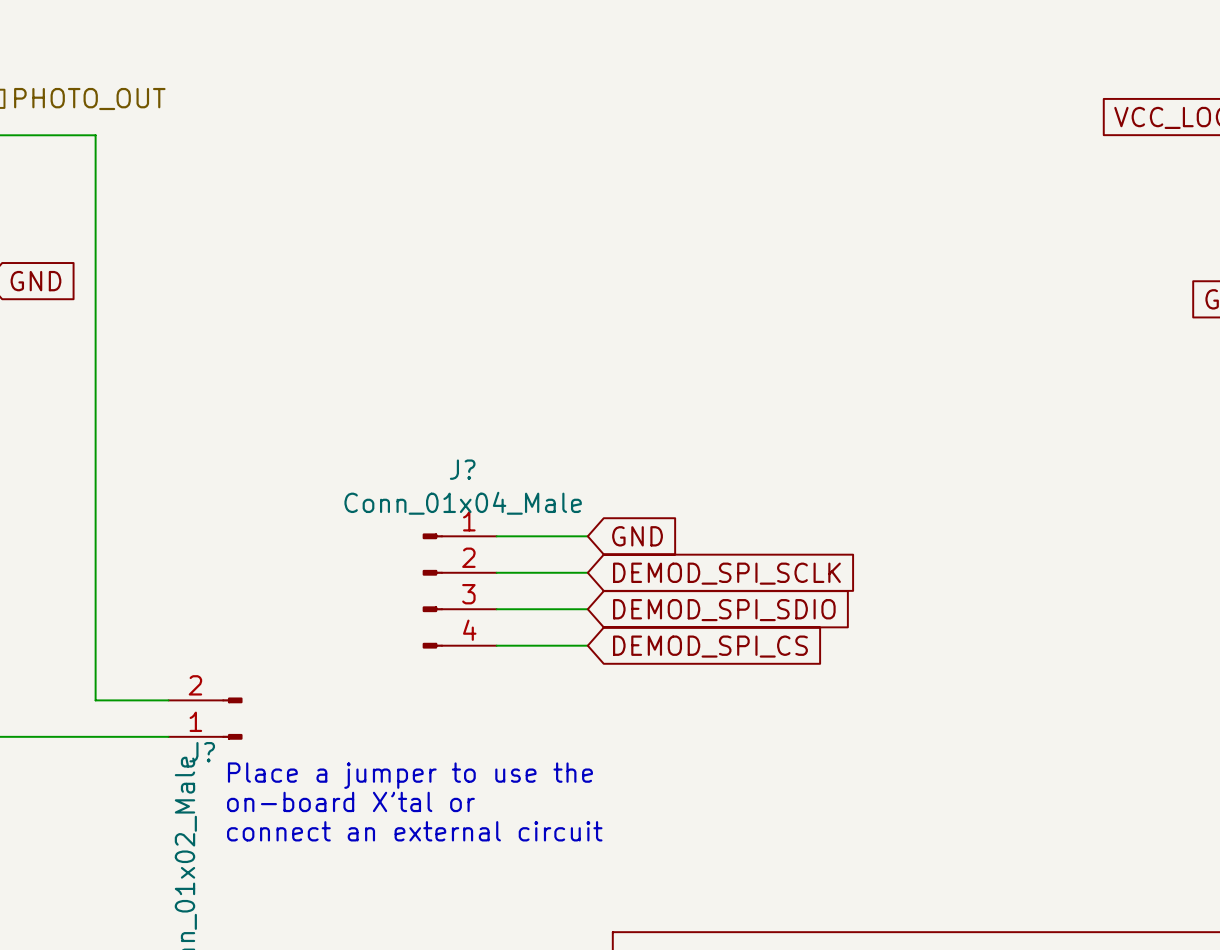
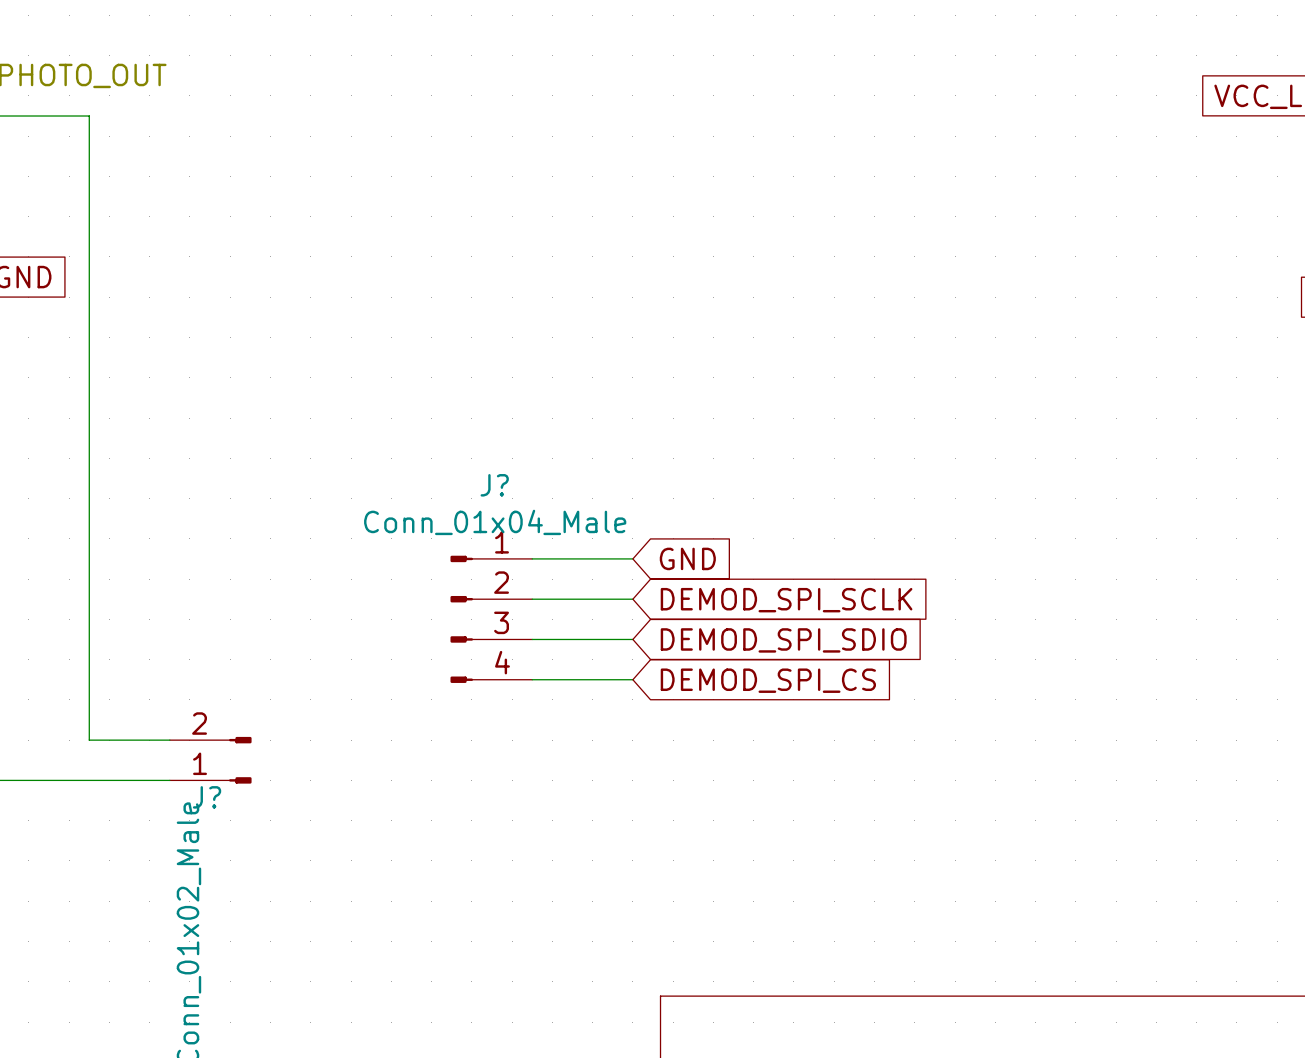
text: Place a jumper to use the (410, 775) -> none
text: on-board X’tal or (350, 801) -> none
text: connect an external circuit (414, 831) -> none

